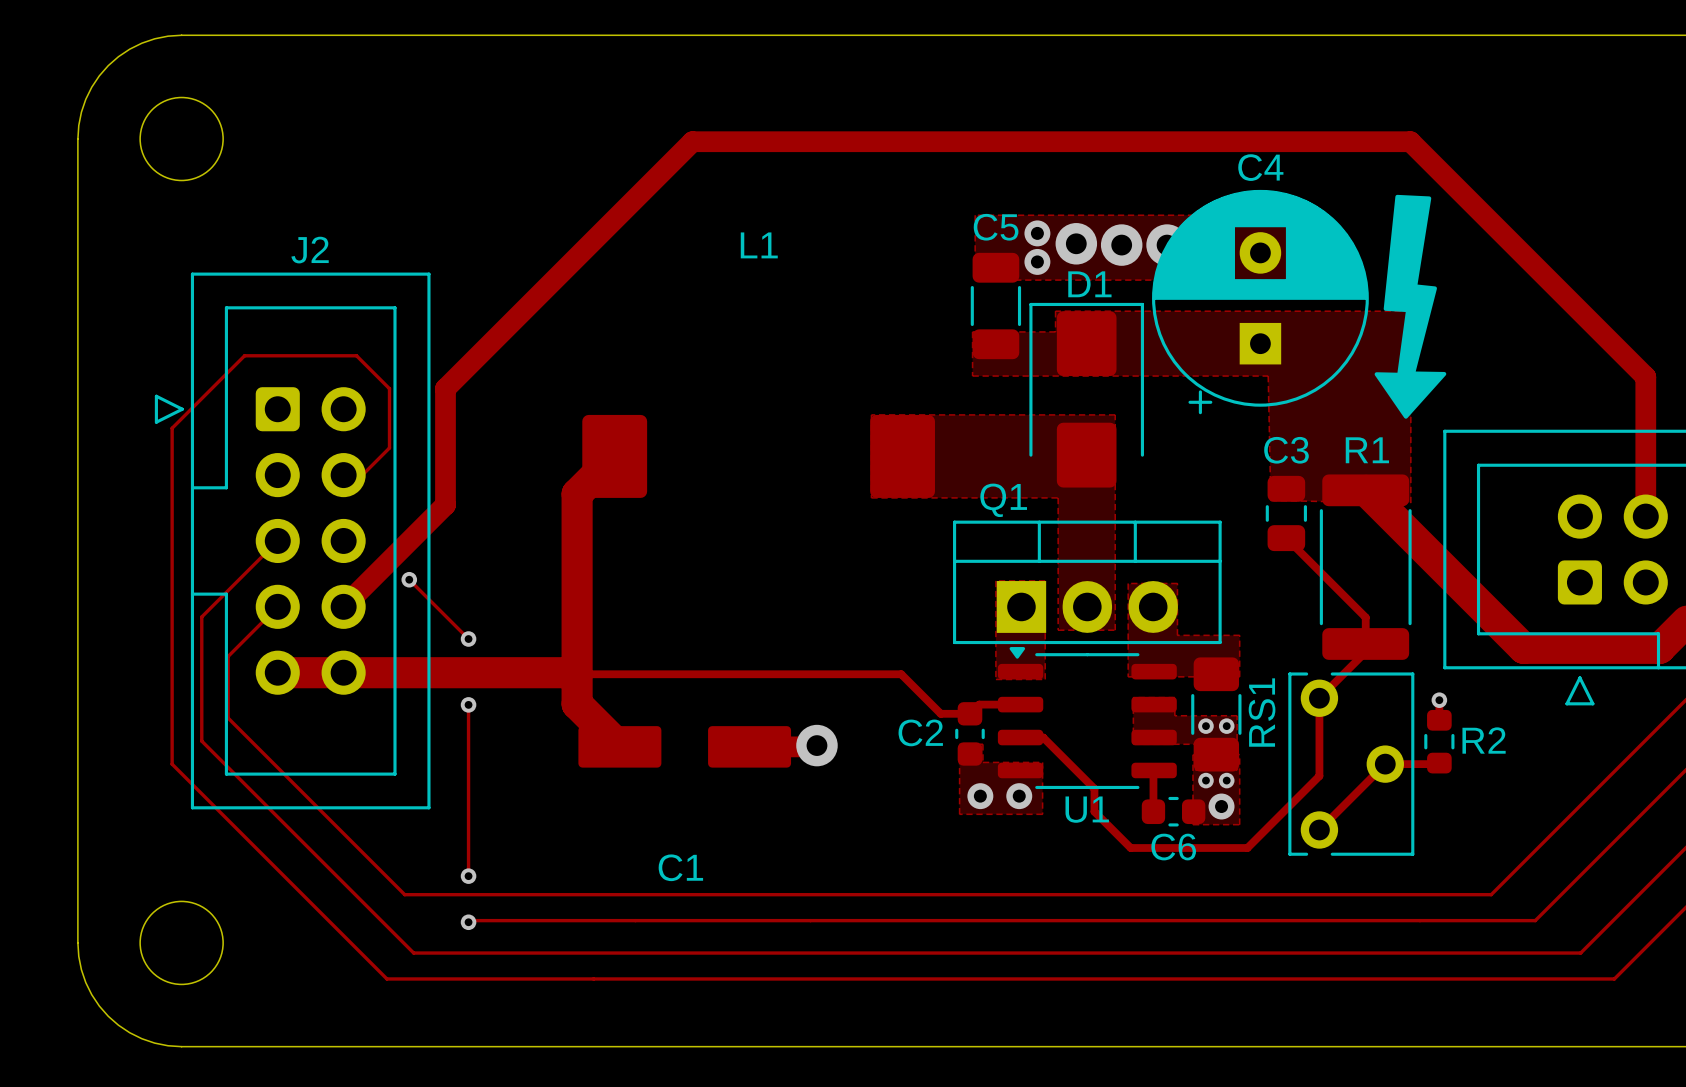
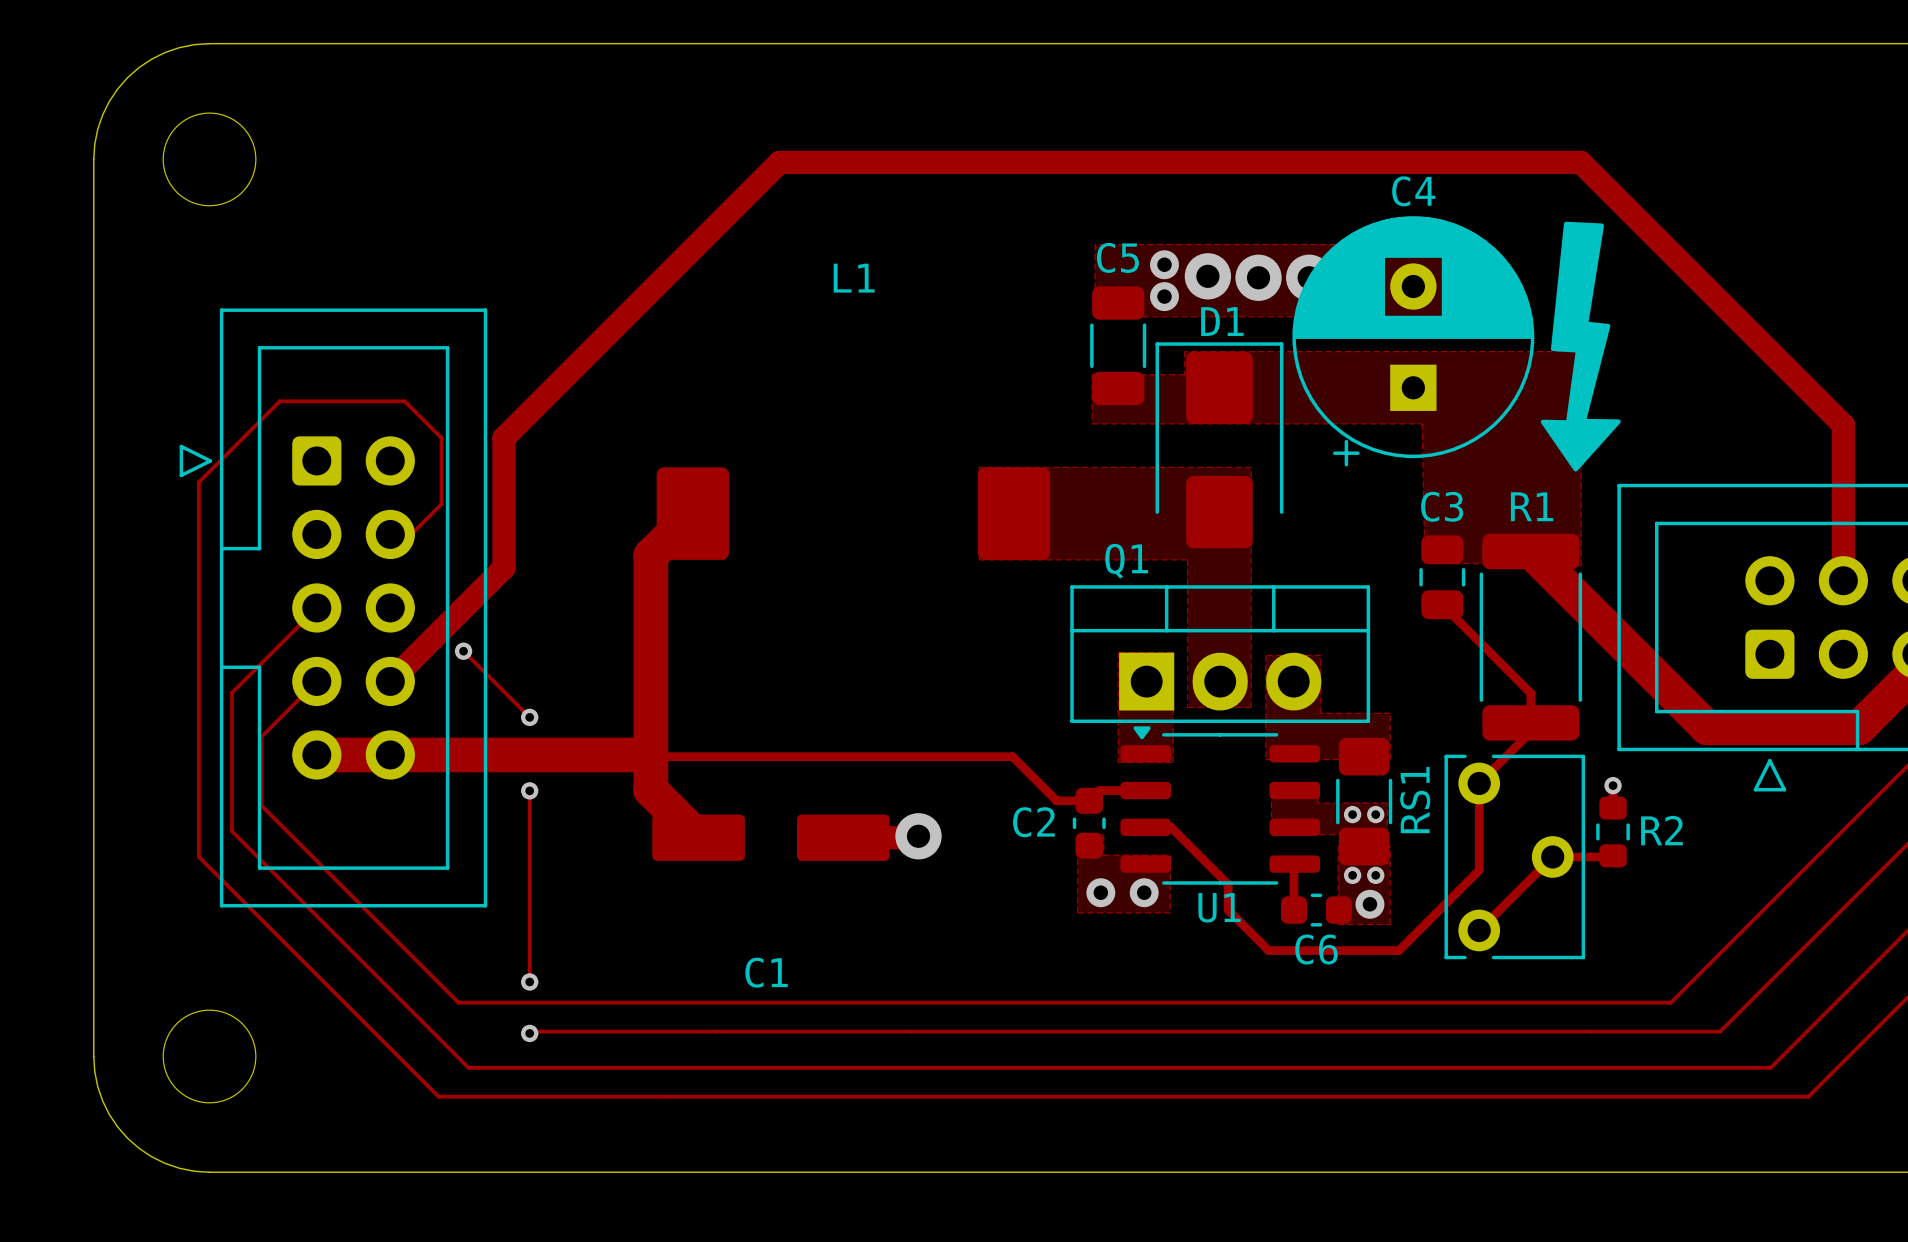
J2 name: J2 (310, 250) -> none

